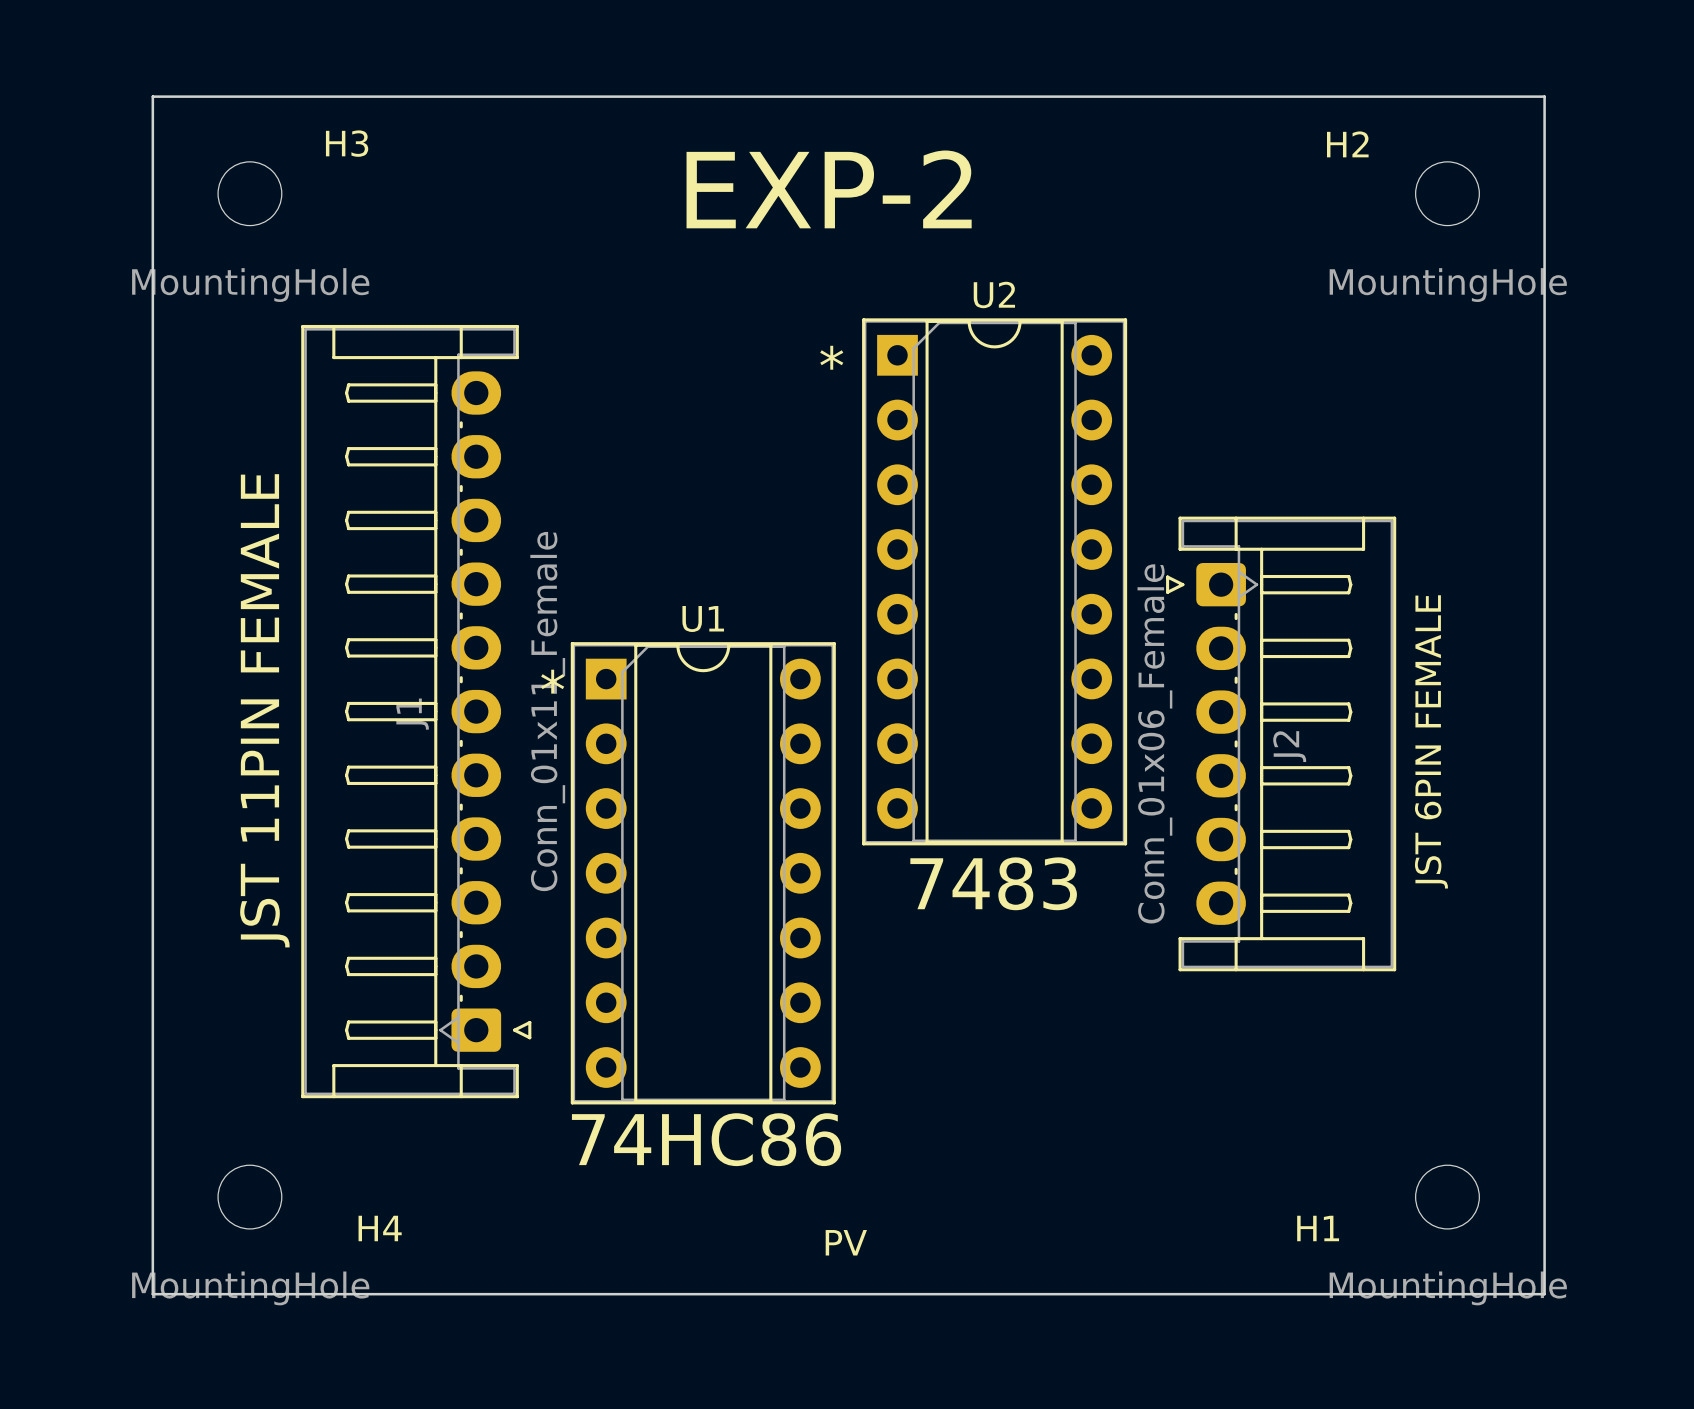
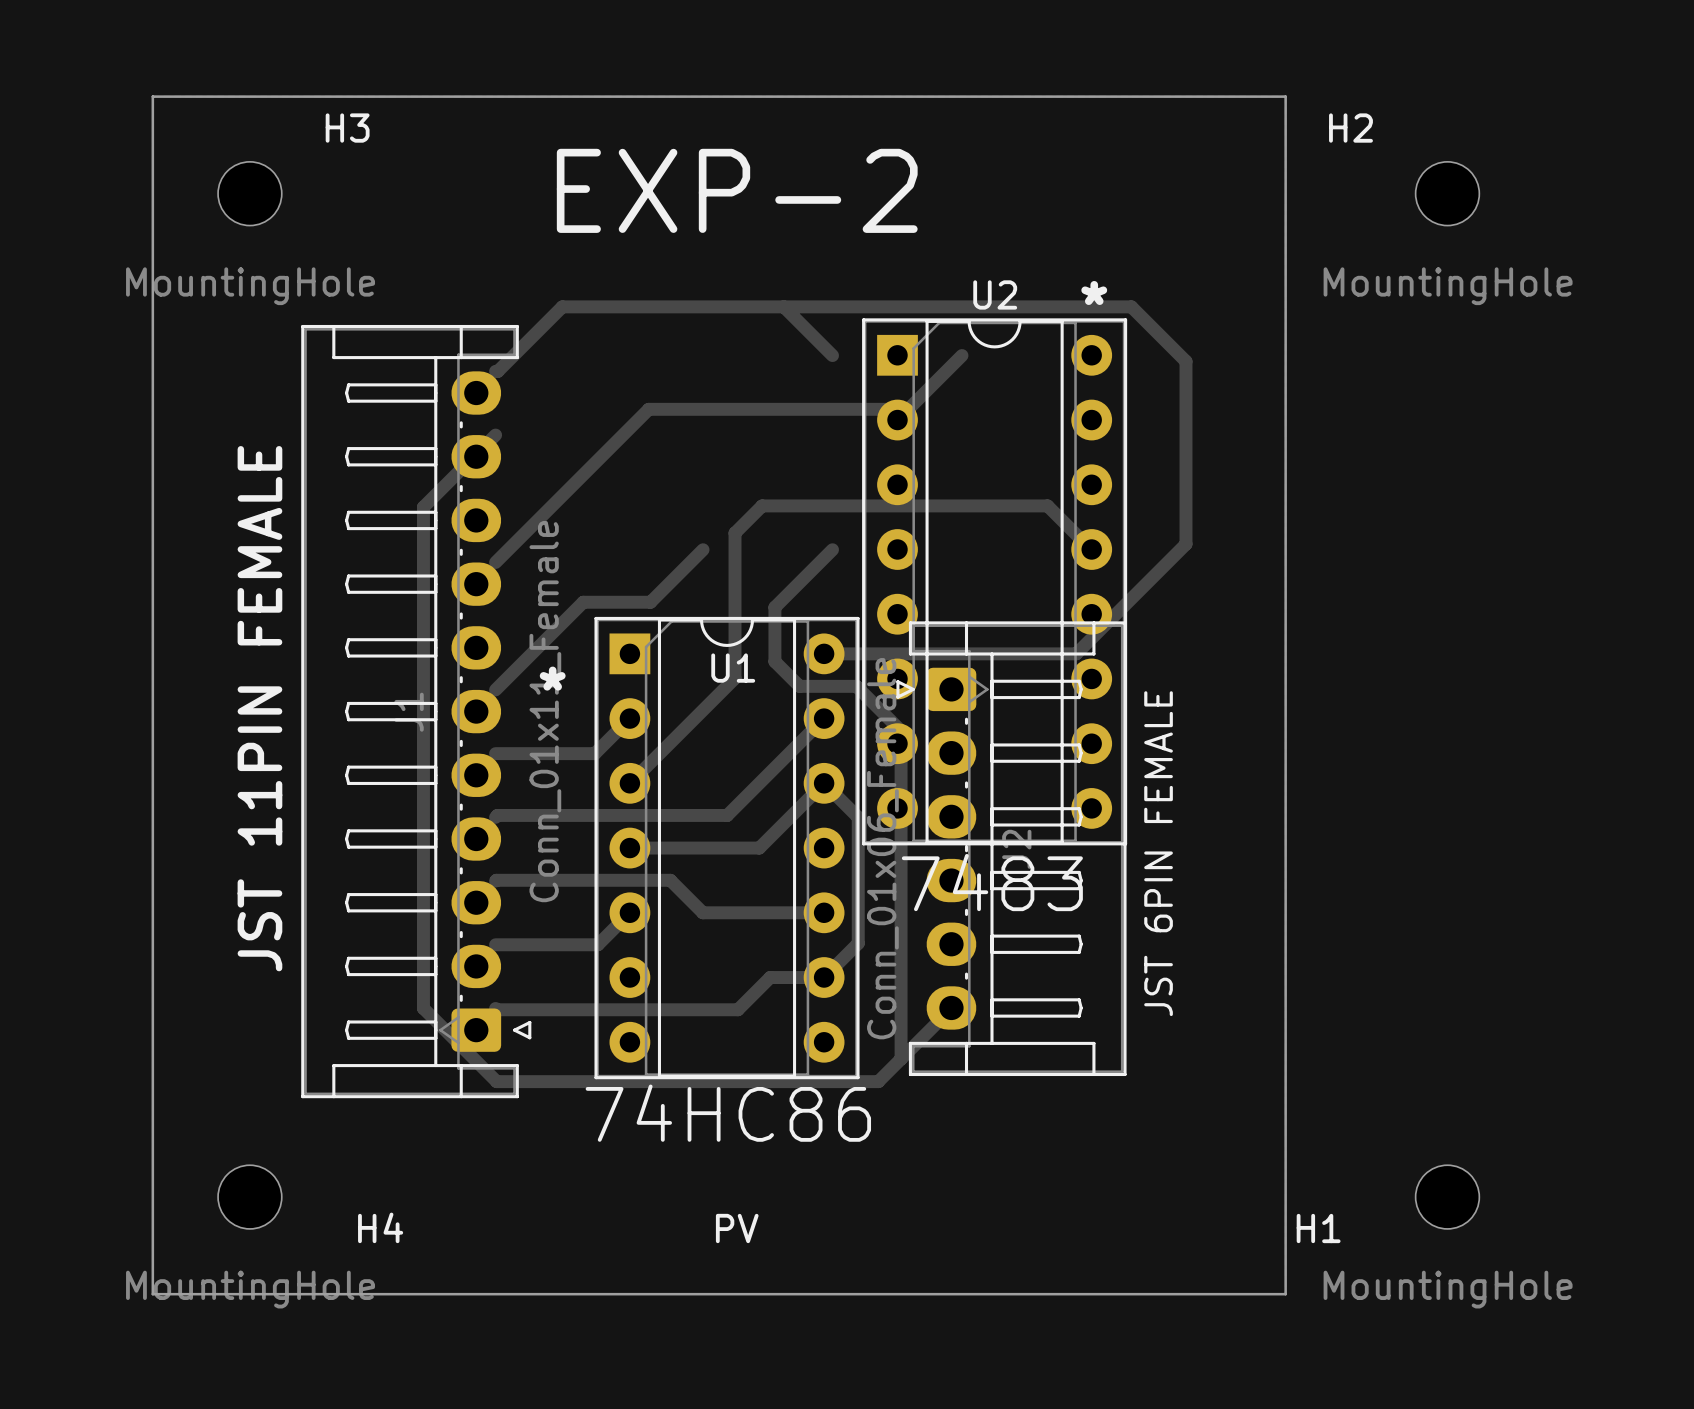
board edge: (1285, 96) (1544, 96) (1544, 1294) (1285, 1294) -> (1285, 96) (1285, 1294)
H3 name position: H3 (347, 143) -> H3 (347, 128)
H2 name position: H2 (1347, 144) -> H2 (1350, 128)
text position: EXP-2 (829, 189) -> EXP-2 (737, 190)
track: none -> (783, 306) (832, 355)
track: none -> (961, 355) (908, 409) (648, 409) (495, 562)
text position: * (831, 357) -> * (1094, 292)
track: none -> (495, 371) (497, 371) (562, 306) (1131, 306) (1186, 361) (1186, 544) (1076, 653) (824, 653)
track: none -> (495, 435) (423, 507) (423, 1008) (496, 1081) (878, 1081) (951, 1008)
track: none -> (703, 549) (650, 602) (583, 602) (495, 689)
track: none -> (832, 549) (774, 607) (774, 661) (799, 686) (856, 686) (901, 730) (901, 1058)
track: none -> (1091, 549) (1047, 505) (762, 505) (735, 533) (735, 678) (629, 783)
U1 name position: U1 (703, 619) -> U1 (733, 668)
track: none -> (629, 718) (594, 753) (495, 753)
track: none -> (824, 718) (727, 815) (497, 815) (495, 817)
text position: JST 6PIN FEMALE (1431, 741) -> JST 6PIN FEMALE (1158, 853)
J2 position: (1281, 743) -> (1011, 848)
track: none -> (629, 848) (759, 848) (824, 783) (858, 817) (858, 943) (824, 977) (770, 977) (737, 1009) (495, 1008)
U1 position: (703, 873) -> (727, 848)
track: none -> (495, 881) (670, 880) (702, 912) (824, 912)
track: none -> (629, 912) (597, 944) (495, 944)
text position: PV (846, 1242) -> PV (737, 1228)

